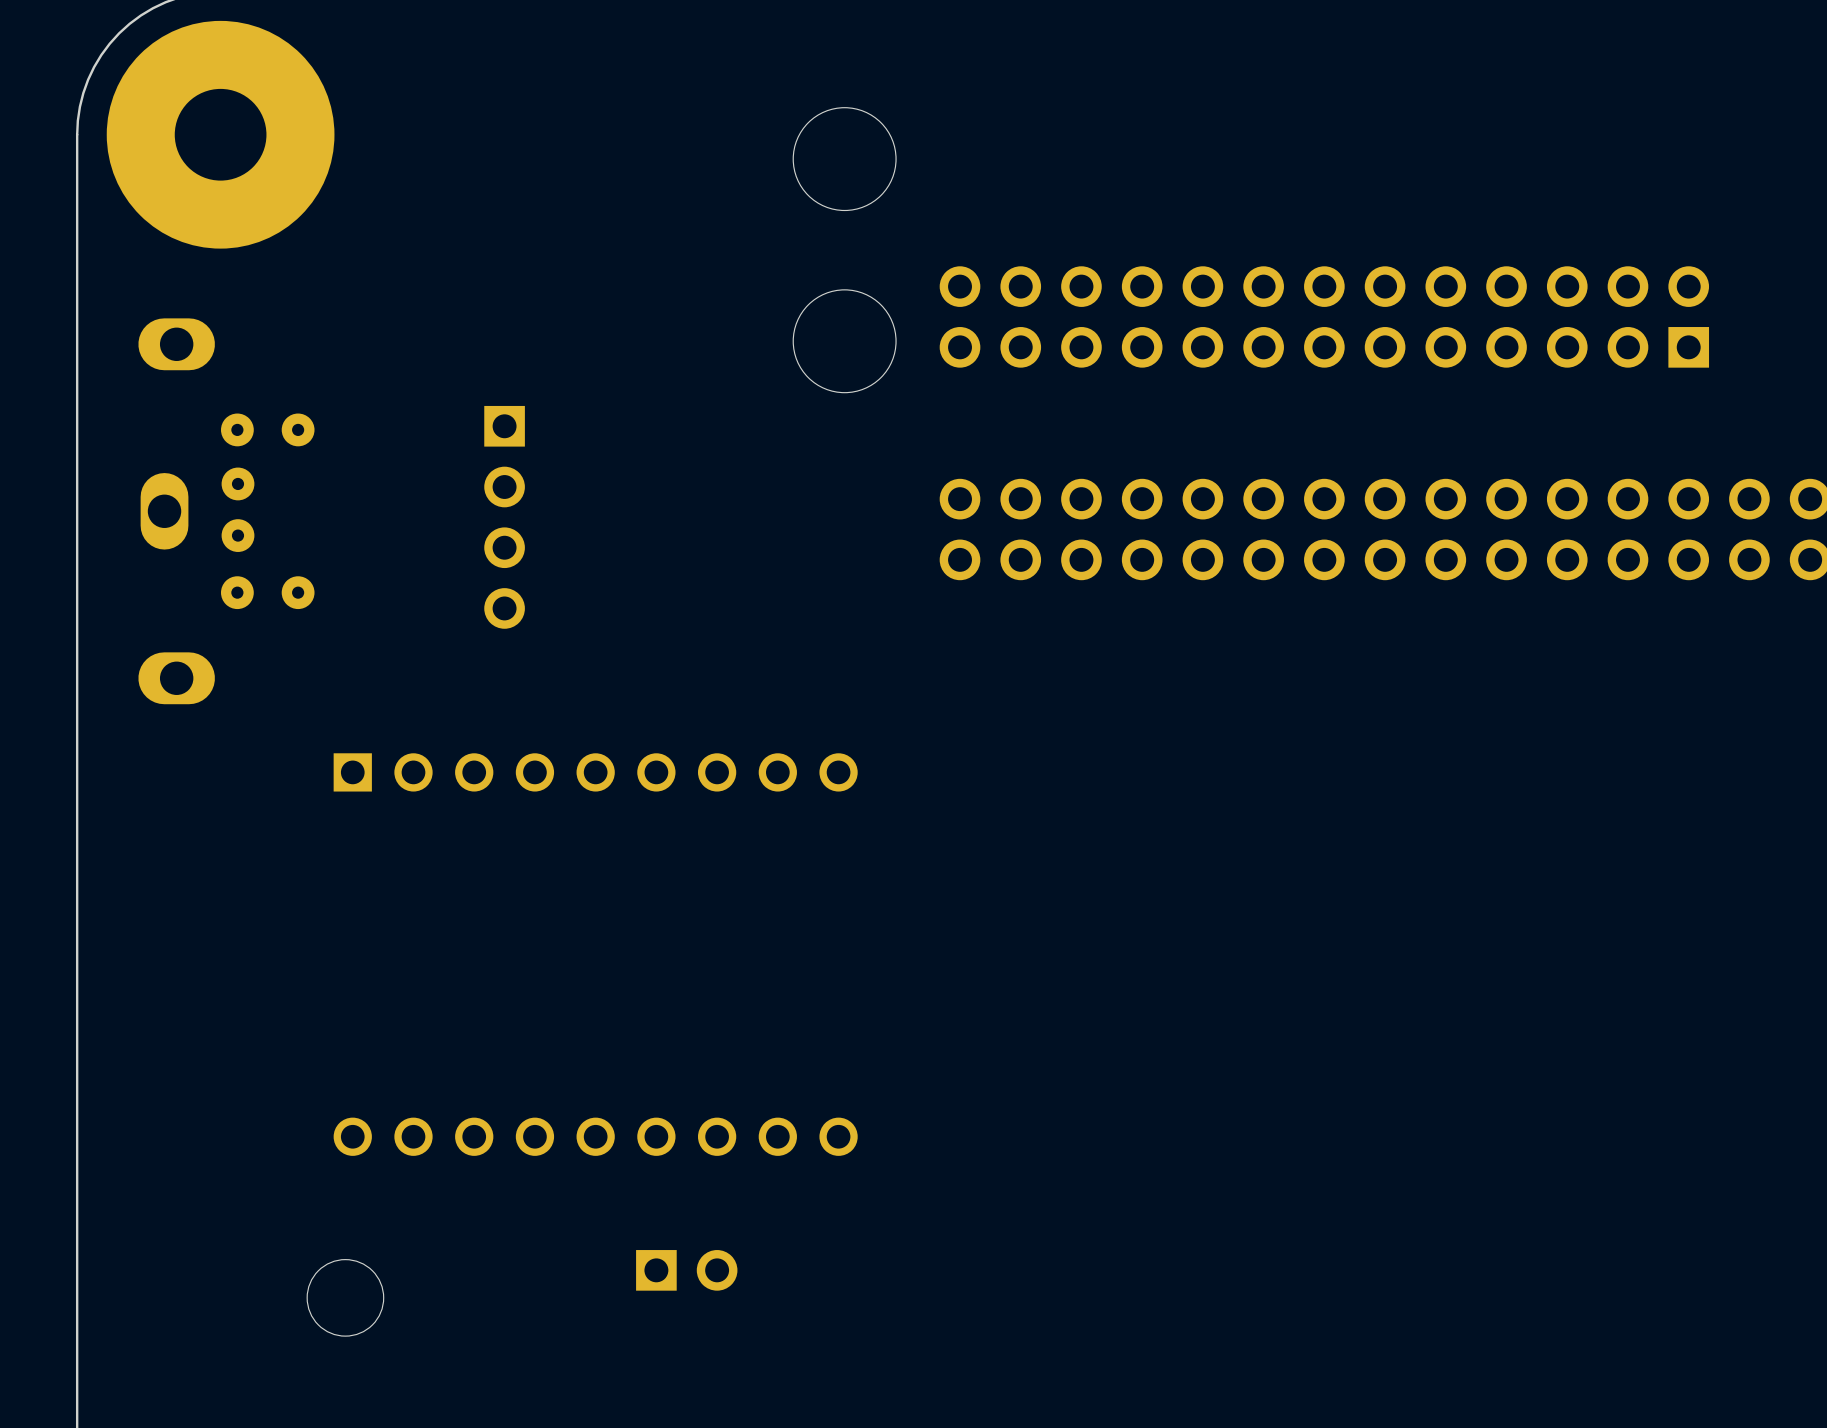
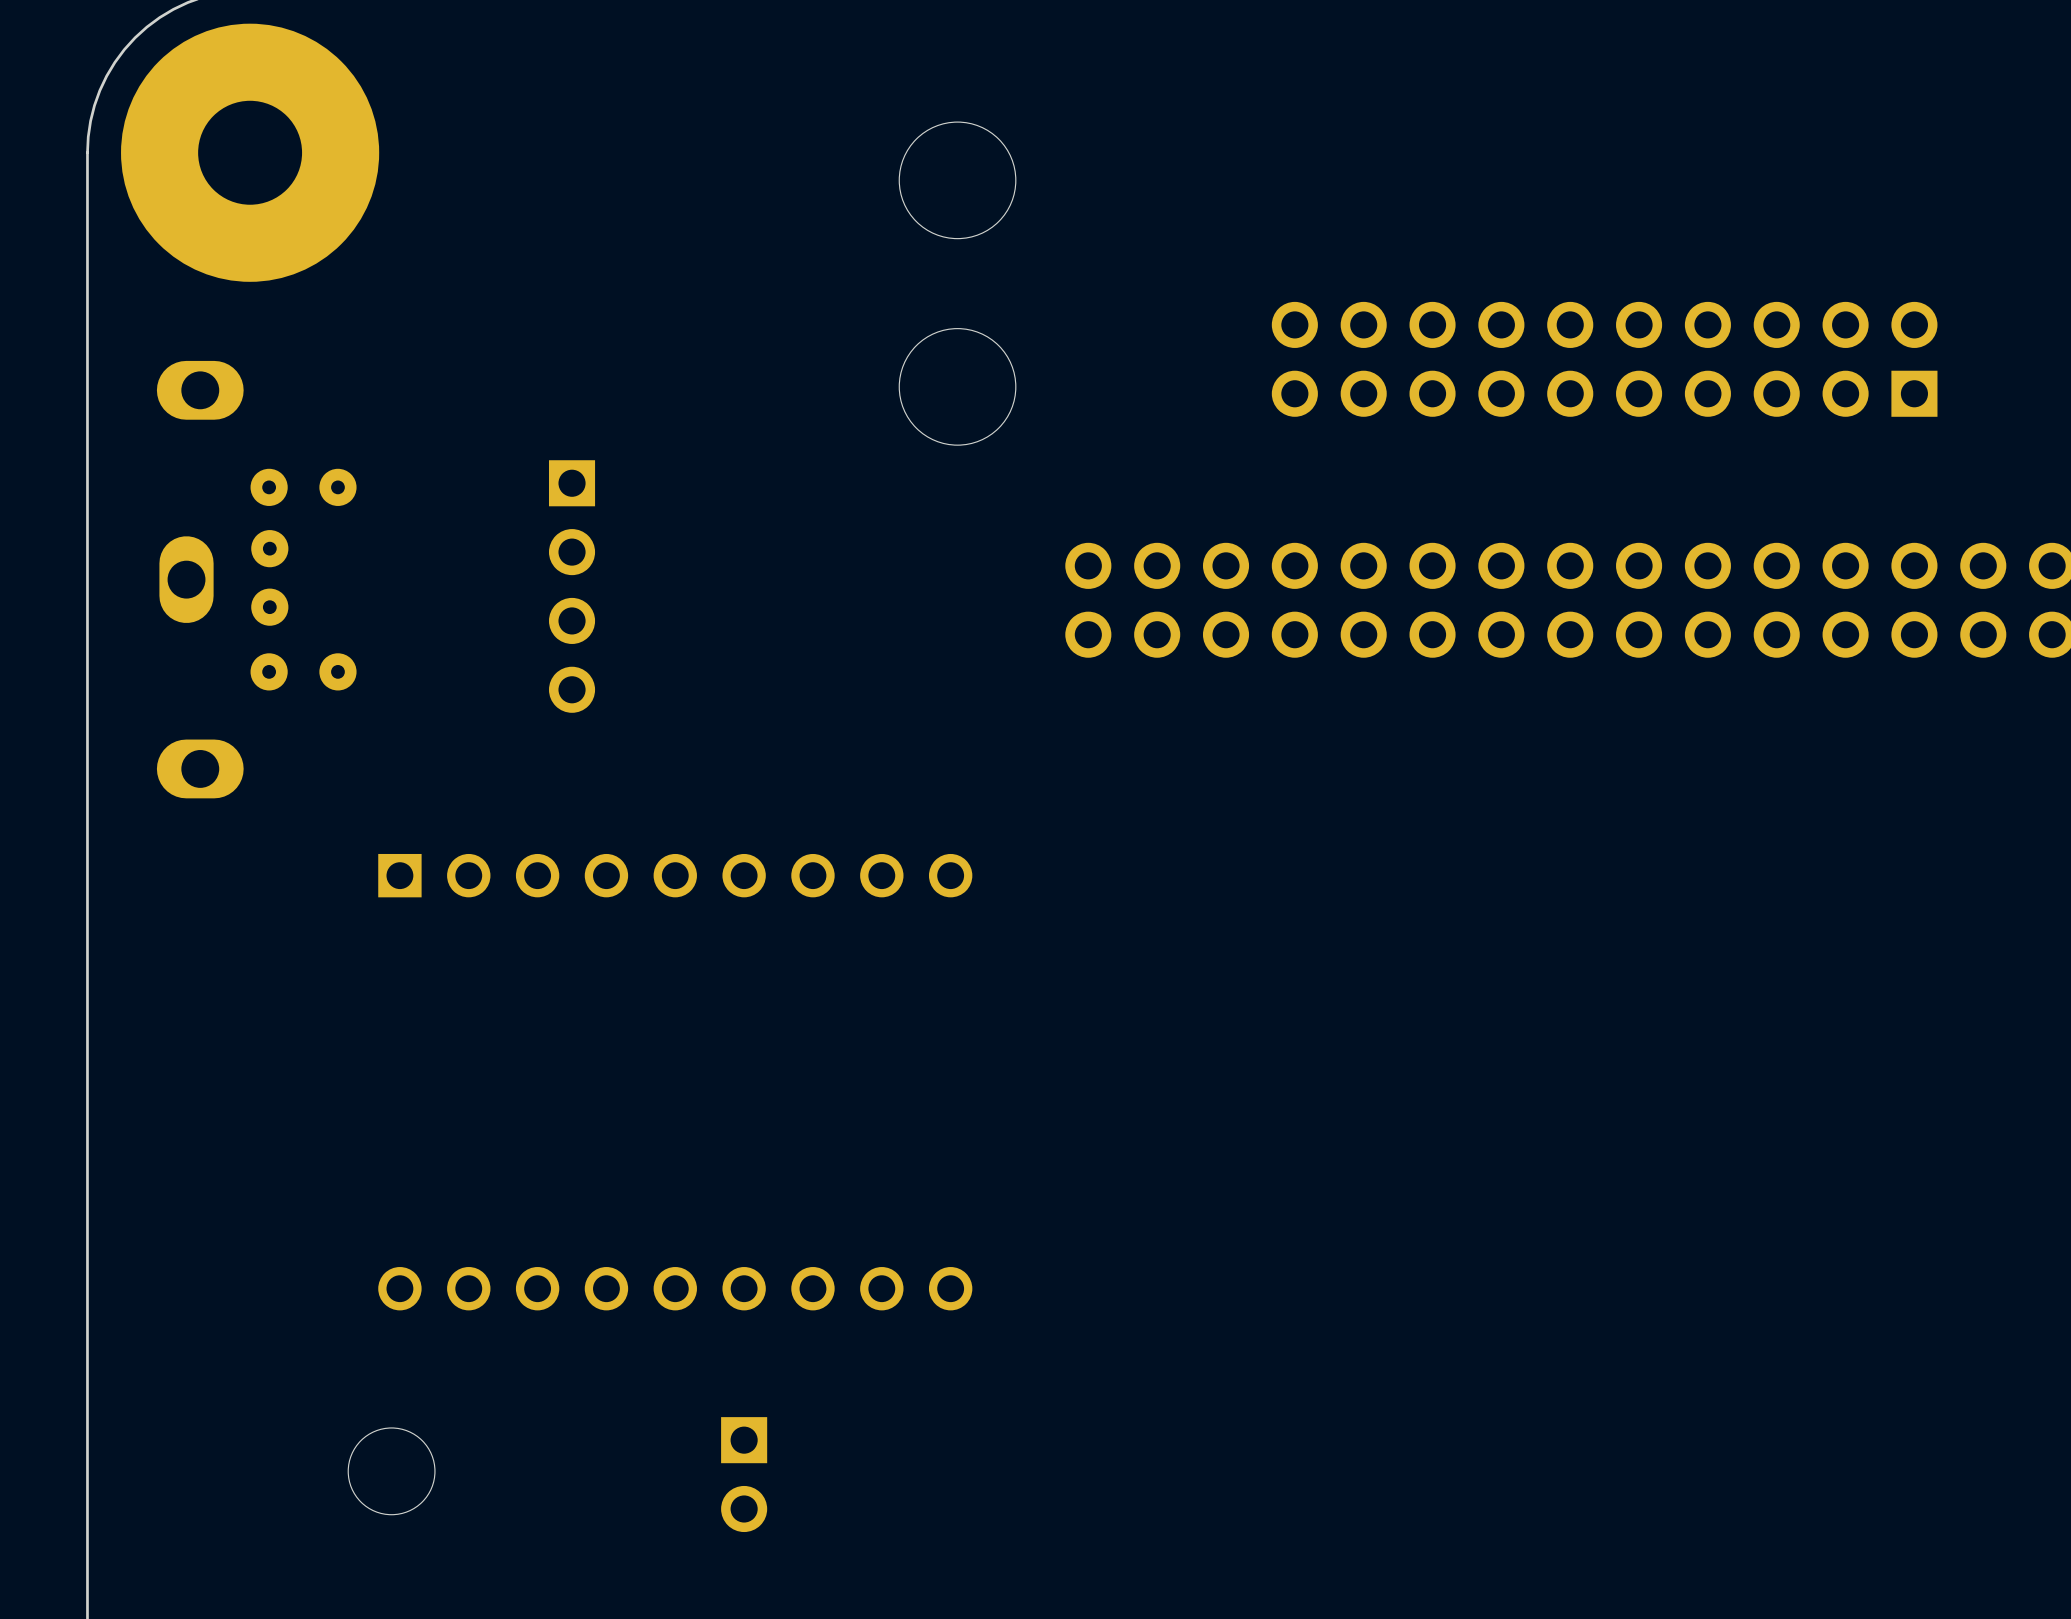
part: (1324, 316) -> none
part rotation: 0° (686, 1270) -> 90° clockwise (744, 1474)

